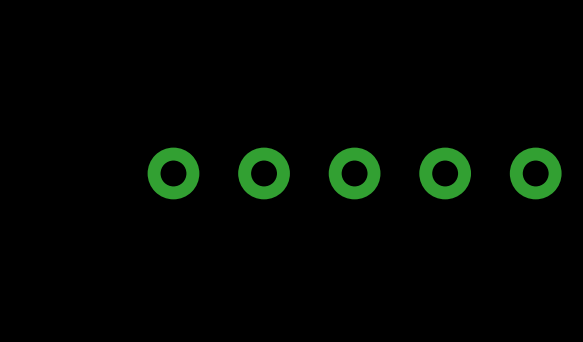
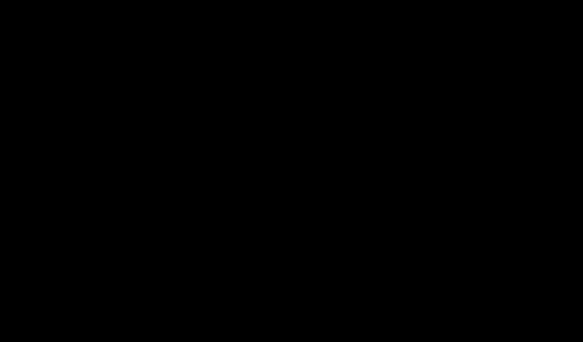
part: (173, 173) -> none
part: (264, 173) -> none
part: (354, 173) -> none
part: (445, 173) -> none
part: (535, 173) -> none

